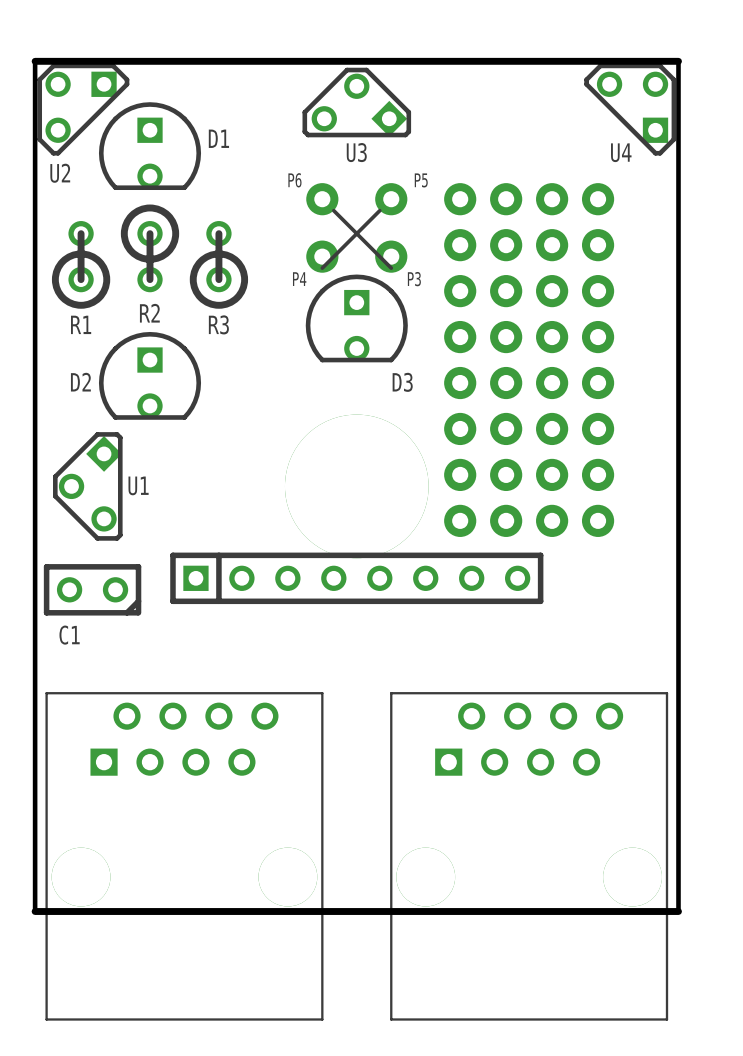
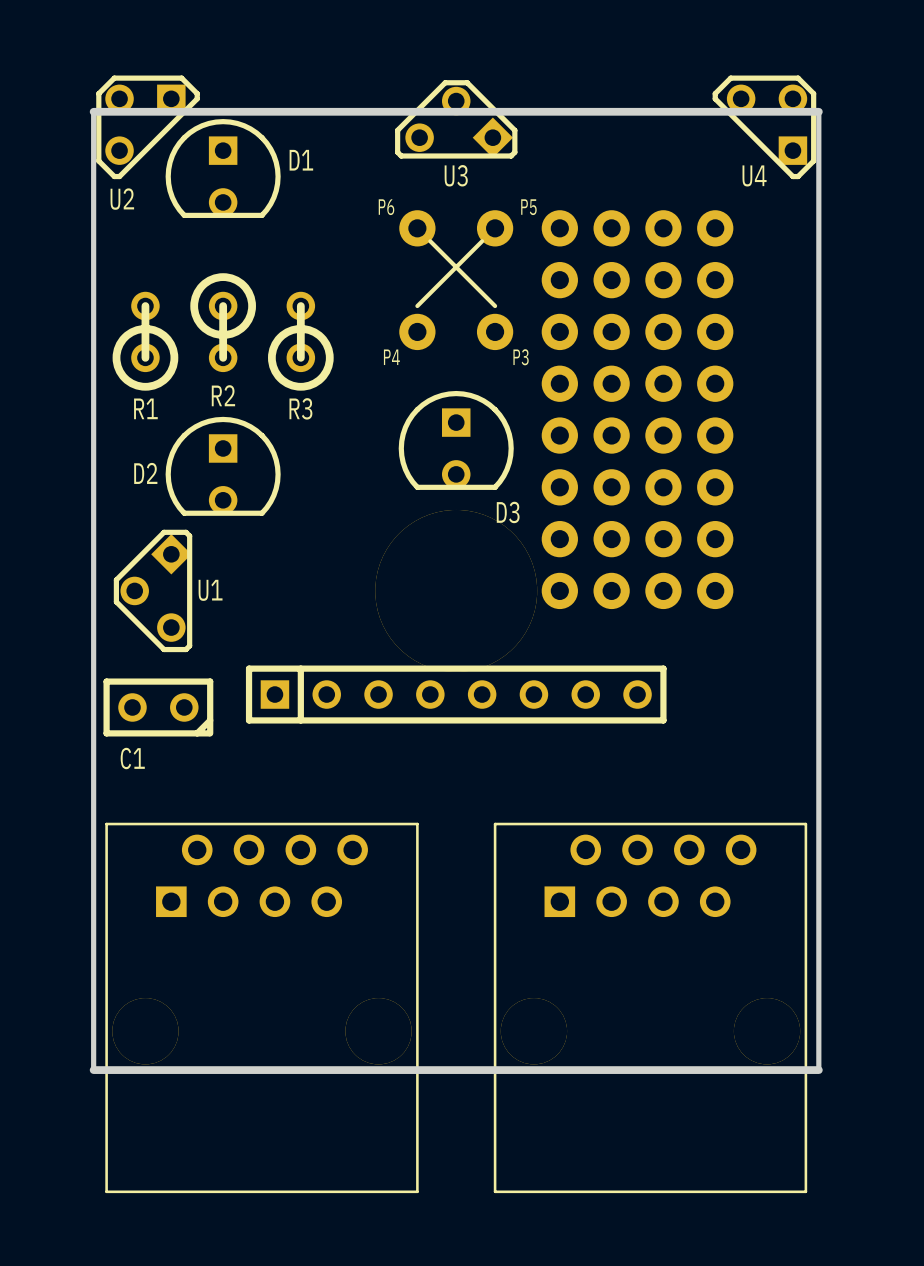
part position: (356, 102) -> (456, 119)
U2 position: (83, 109) -> (148, 127)
U4 position: (630, 109) -> (764, 127)
D1 position: (150, 146) -> (223, 168)
text position: U3 (356, 152) -> U3 (456, 175)
P6 position: (322, 199) -> (417, 228)
P5 position: (391, 199) -> (495, 228)
line: (333, 210) (391, 268) -> (430, 241) (495, 306)
line: (379, 210) (322, 268) -> (482, 241) (417, 306)
D3 position: (356, 318) -> (456, 440)
part position: (529, 360) -> (637, 409)

